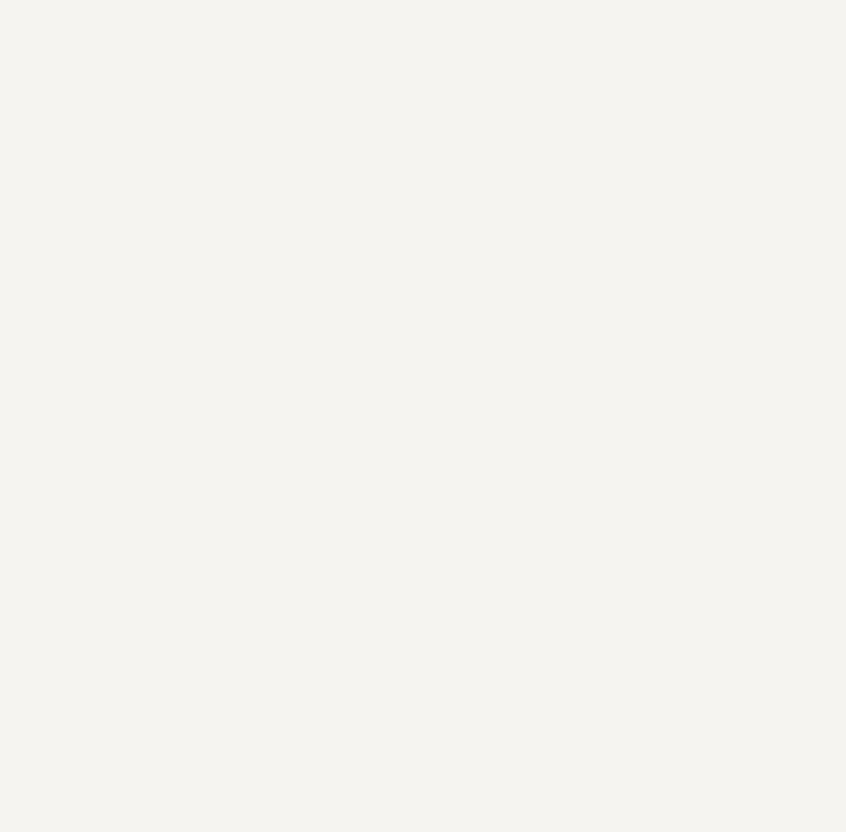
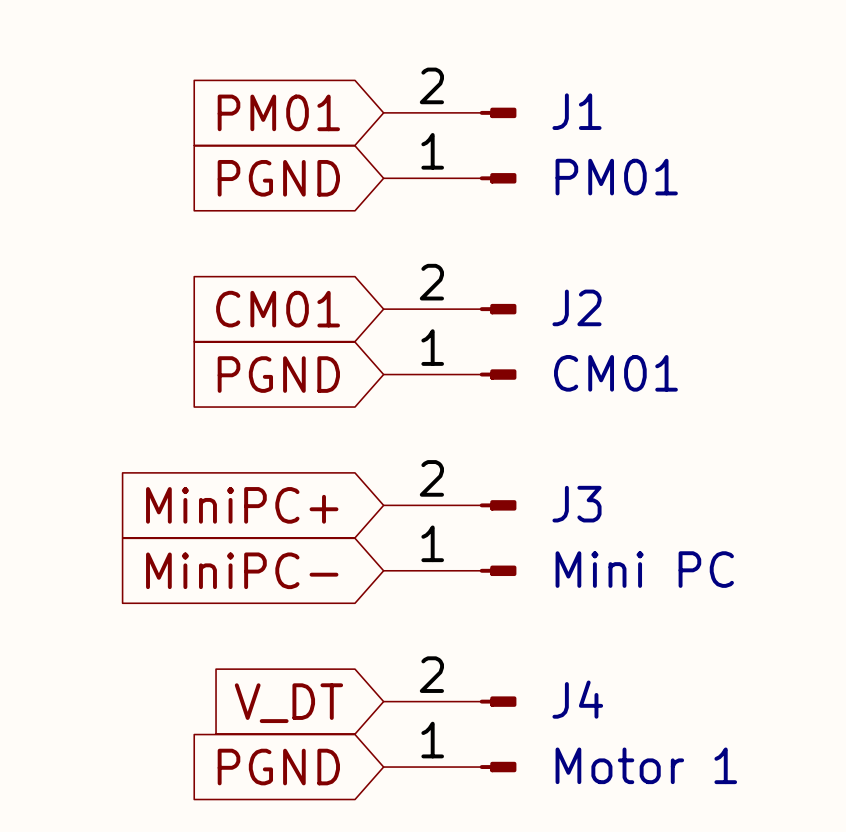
global label: none -> PM01 (278, 112)
J1: none -> PM01 (450, 145)
global label: none -> PGND (278, 178)
global label: none -> CM01 (278, 309)
J2: none -> CM01 (450, 341)
global label: none -> PGND (278, 374)
global label: none -> MiniPC+ (242, 505)
J3: none -> Mini PC (450, 538)
global label: none -> MiniPC- (242, 570)
global label: none -> V_DT (288, 703)
J4: none -> Motor 1 (450, 734)
global label: none -> PGND (278, 767)

